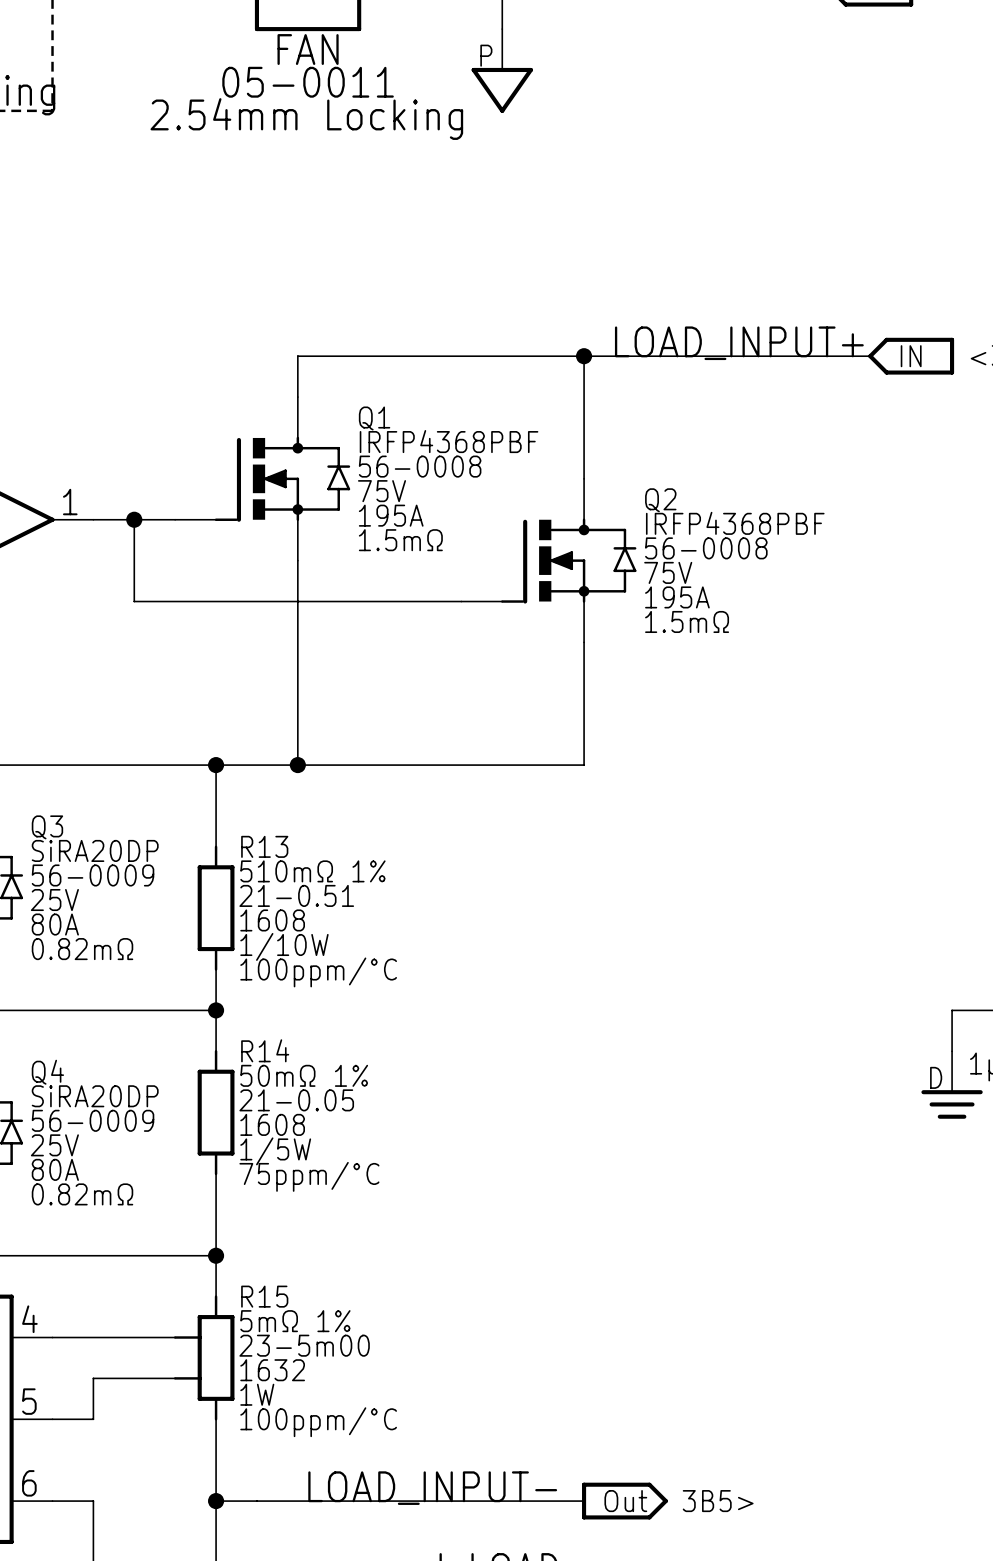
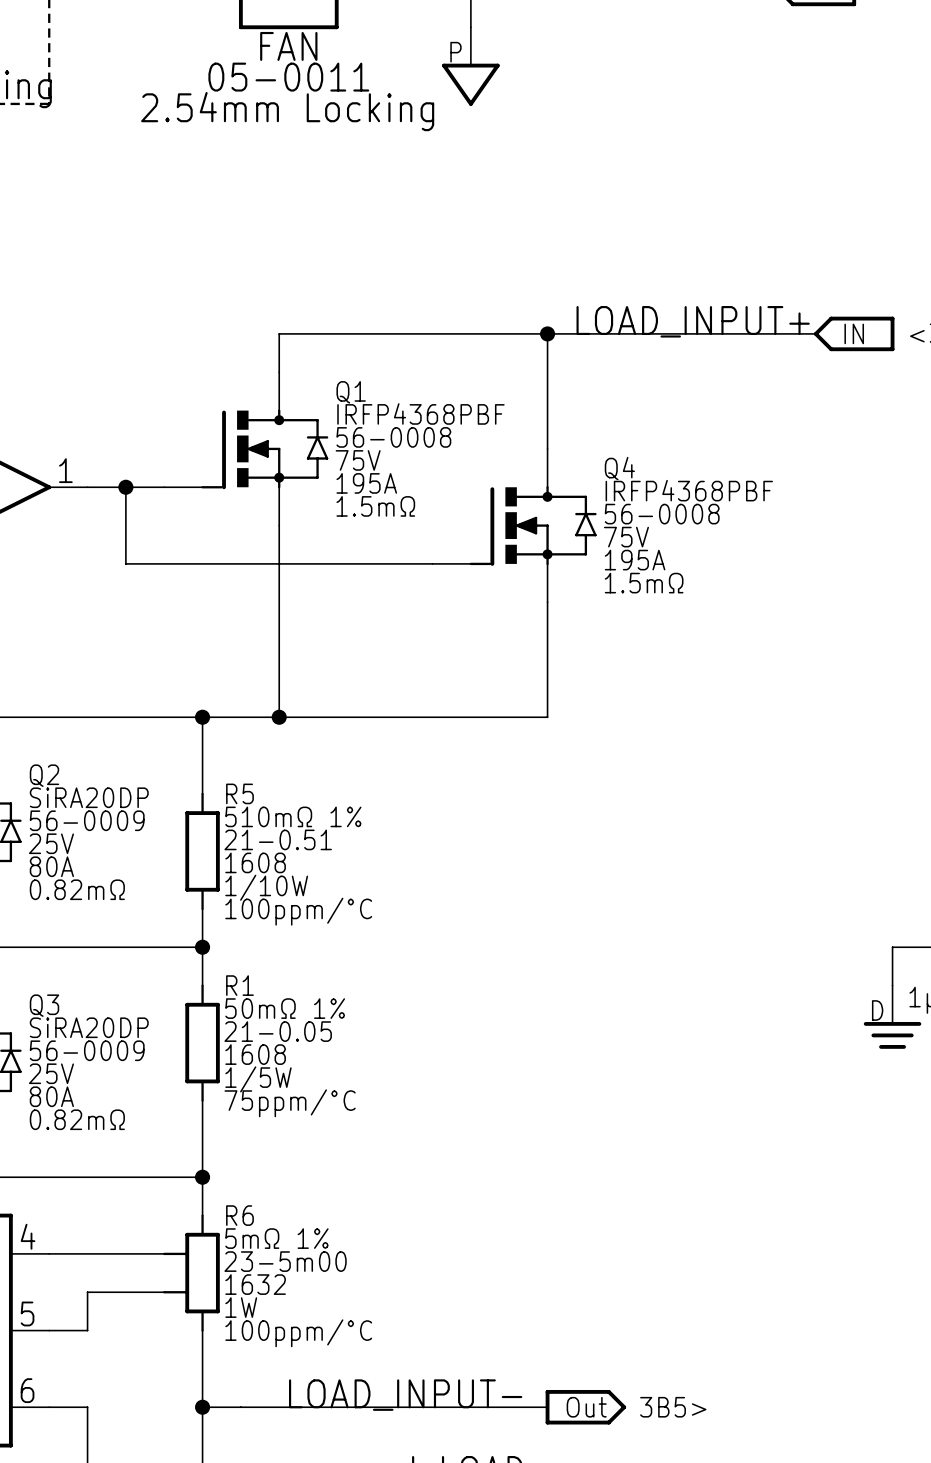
Q2 name: Q2 (660, 500) -> Q4 (619, 468)
Q3 name: Q3 (47, 827) -> Q2 (44, 775)
R13 name: R13 (264, 846) -> R5 (239, 793)
R14 name: R14 (265, 1050) -> R1 (239, 985)
Q4 name: Q4 (47, 1072) -> Q3 (44, 1005)
R15 name: R15 (264, 1296) -> R6 (239, 1215)

